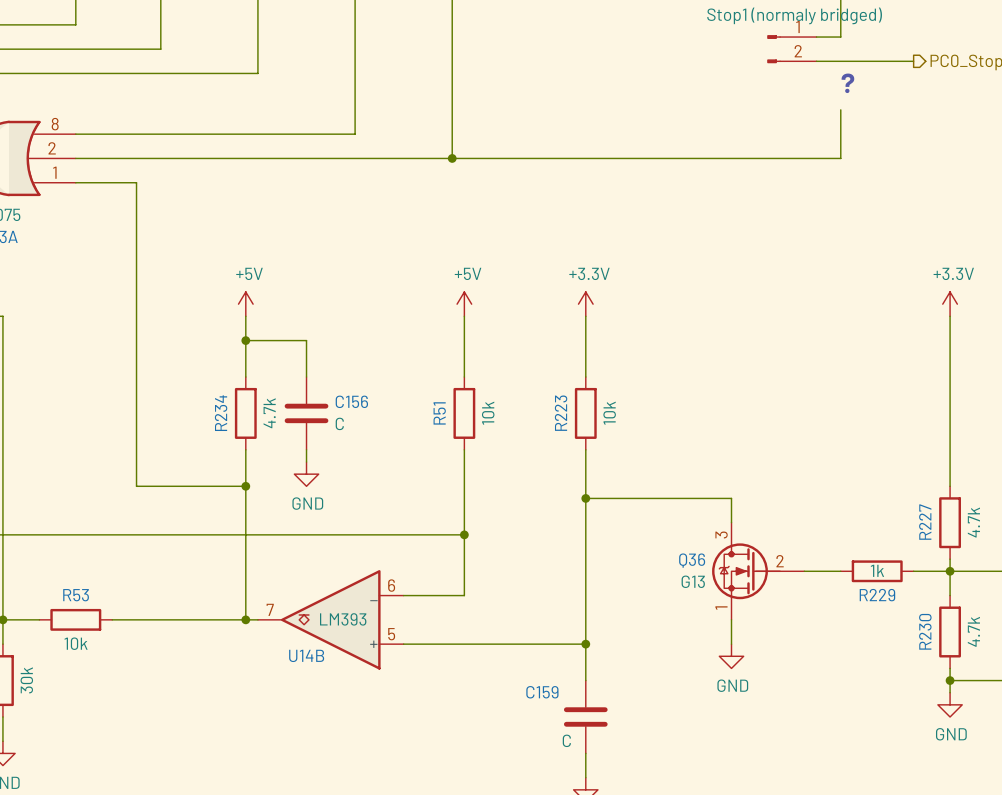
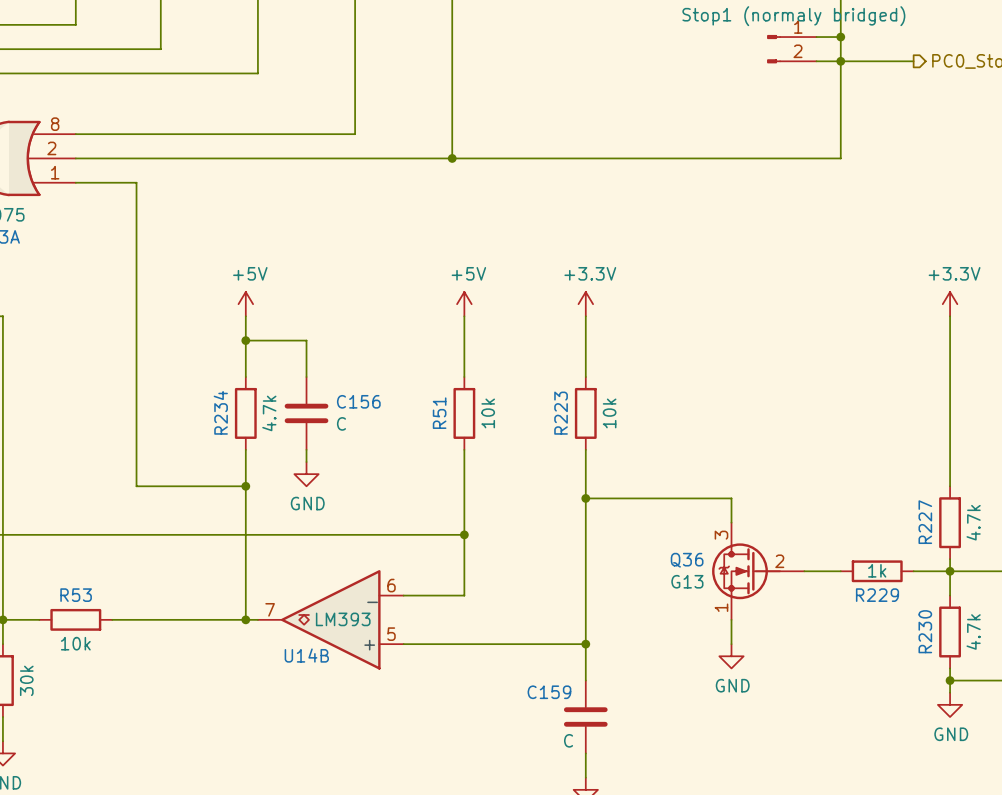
wire: none -> (840, 37) (840, 109)
junction: none -> (840, 37)
junction: none -> (840, 61)
text: ? (847, 83) -> none

